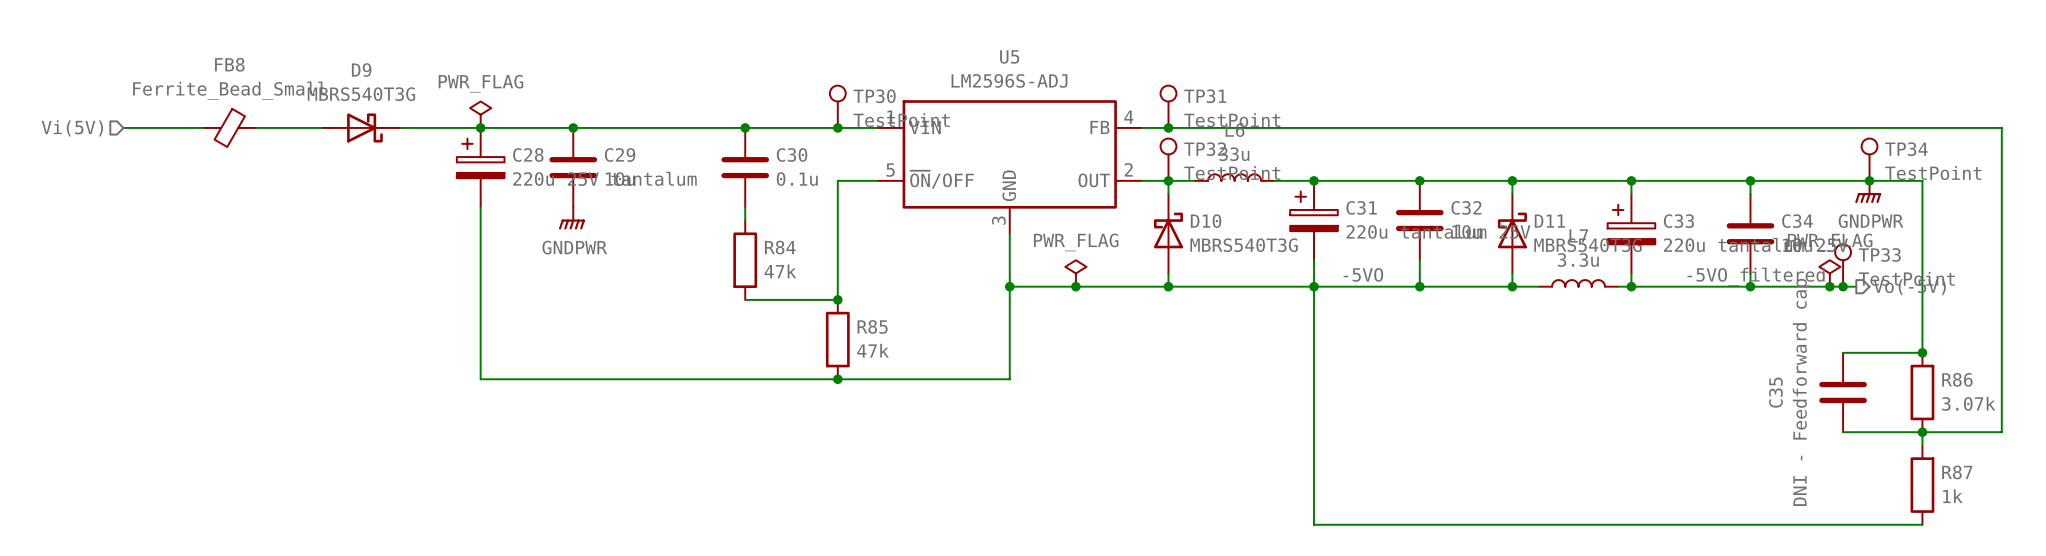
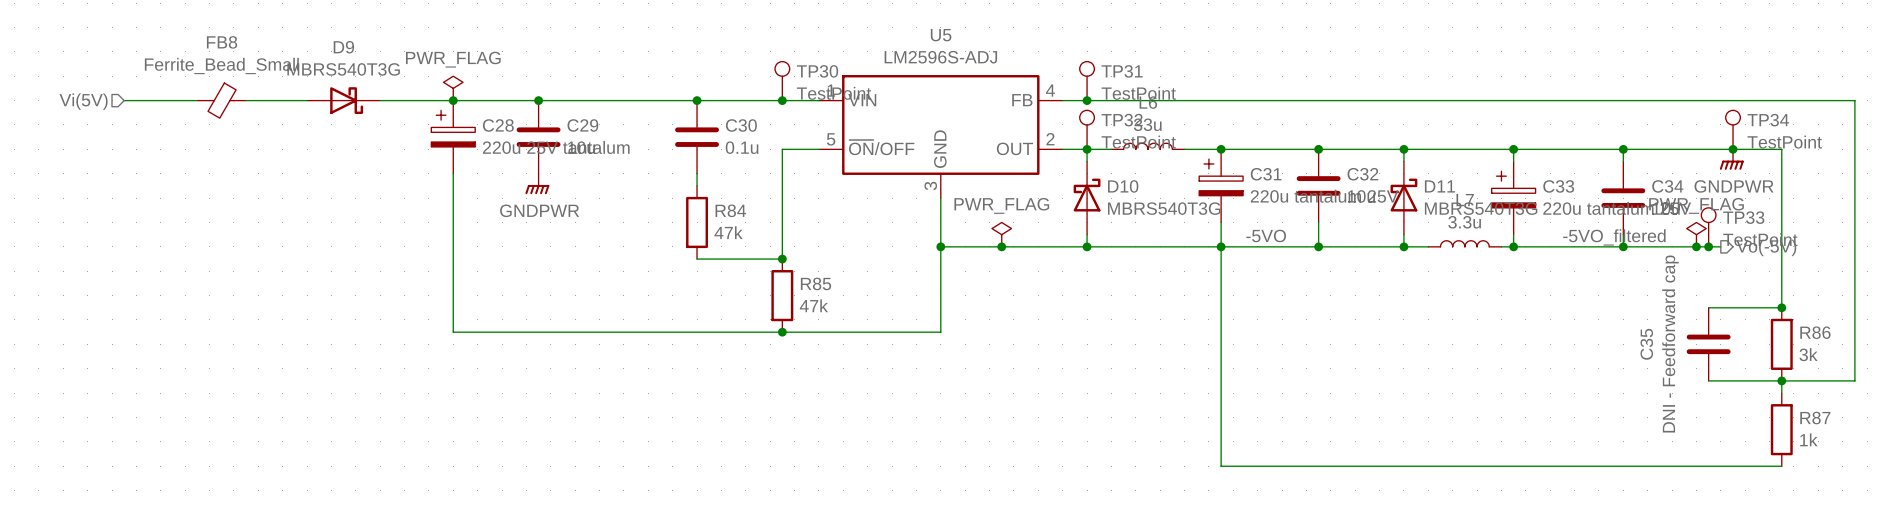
R86 value: 3.07k (1968, 403) -> 3k (1808, 354)

